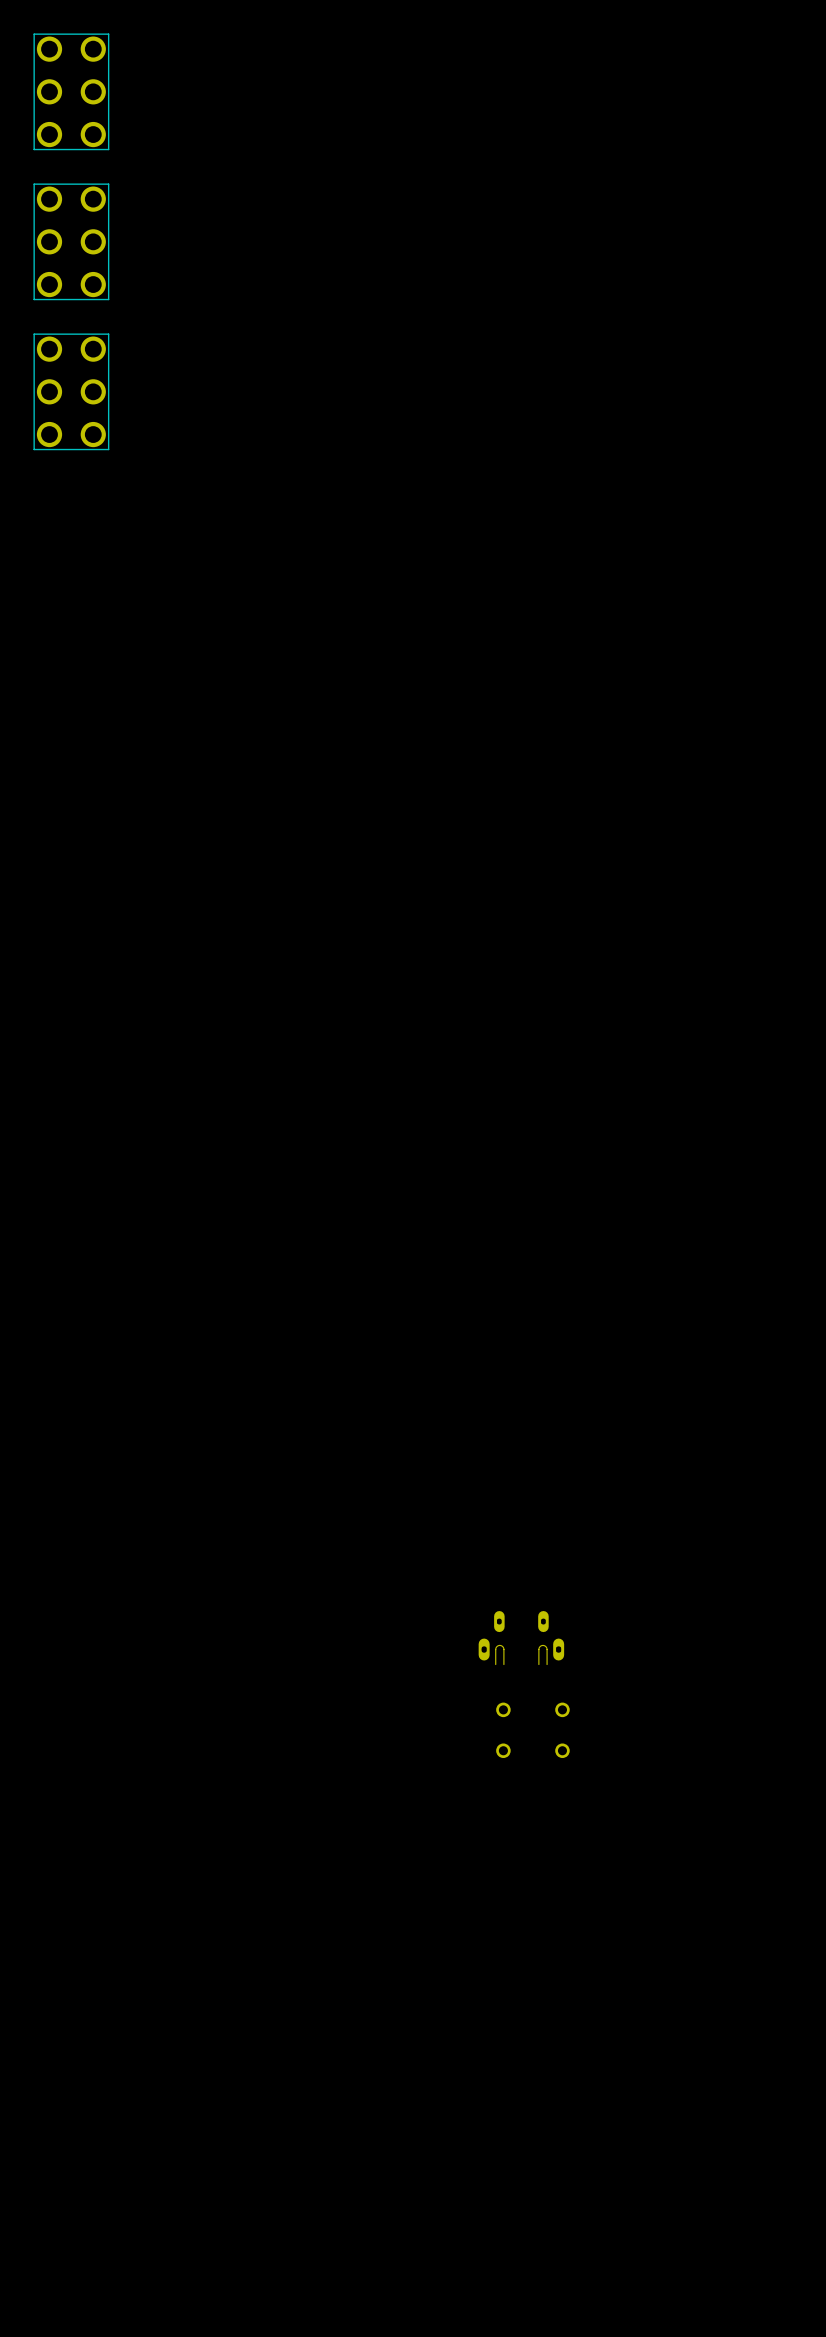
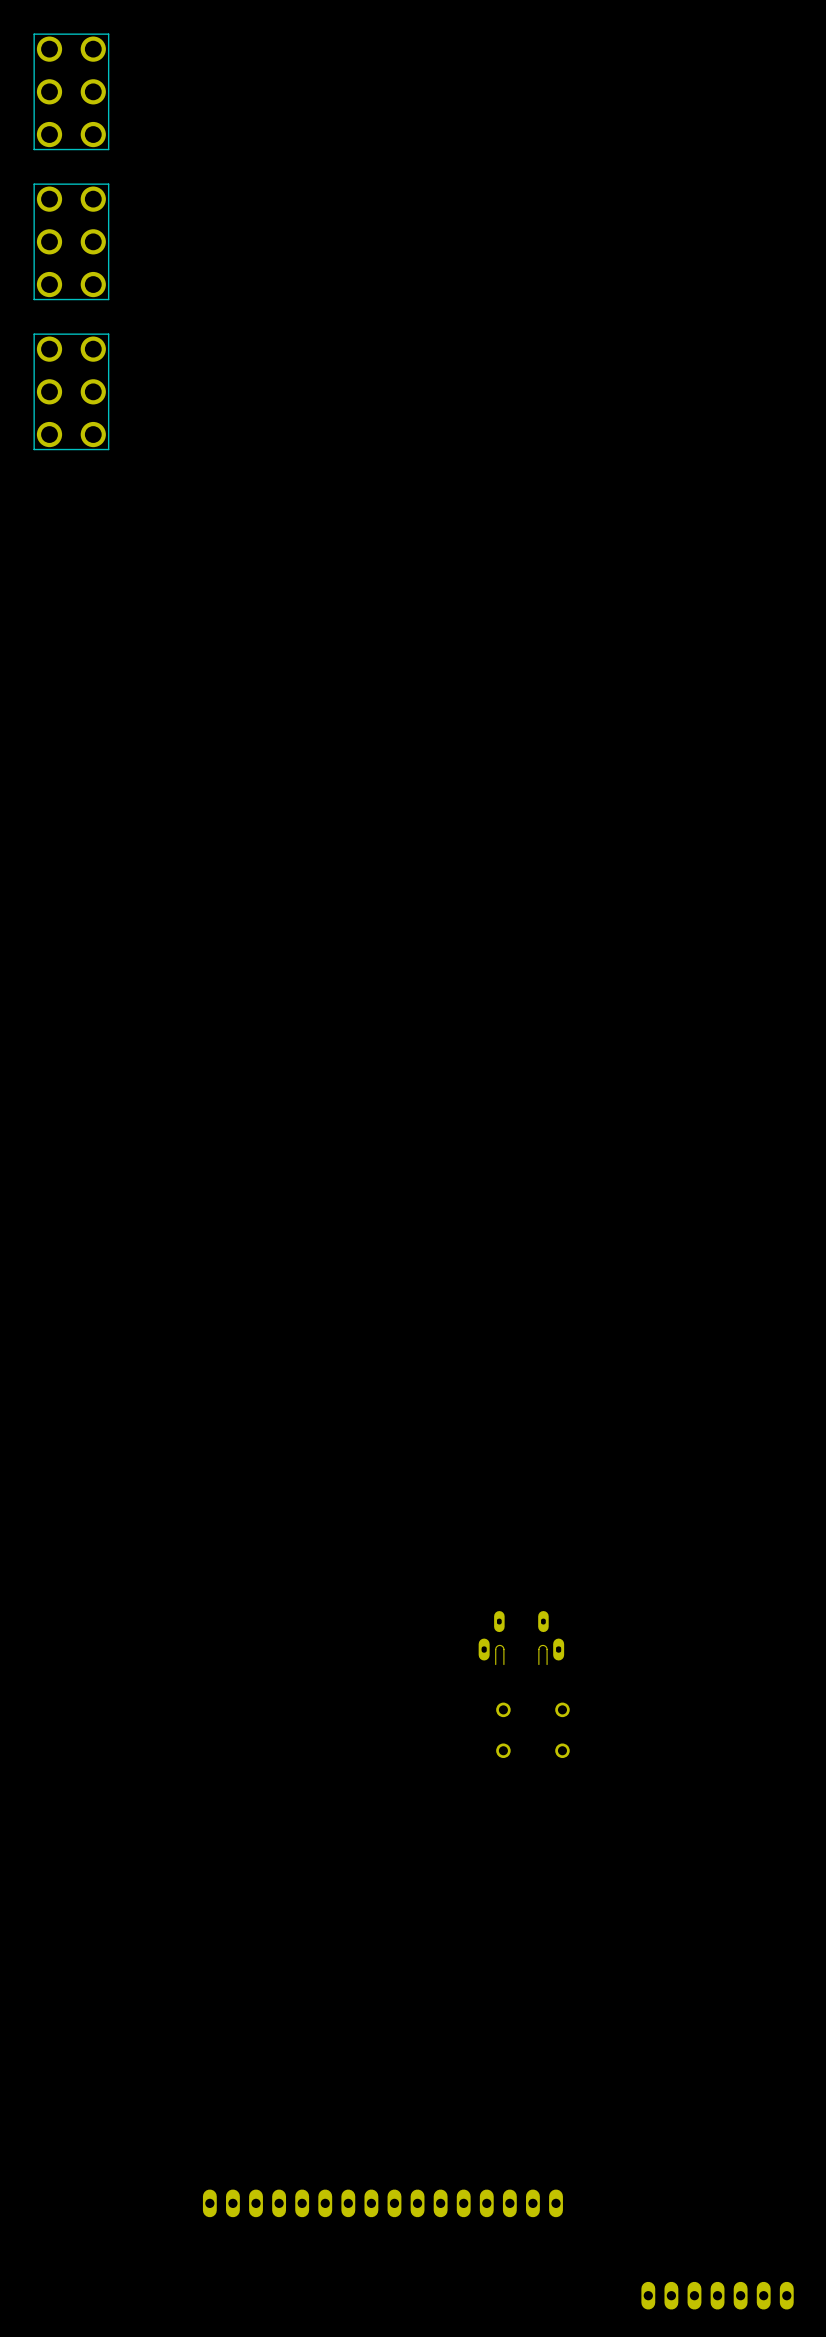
part: none -> (382, 2203)
part: none -> (717, 2295)

